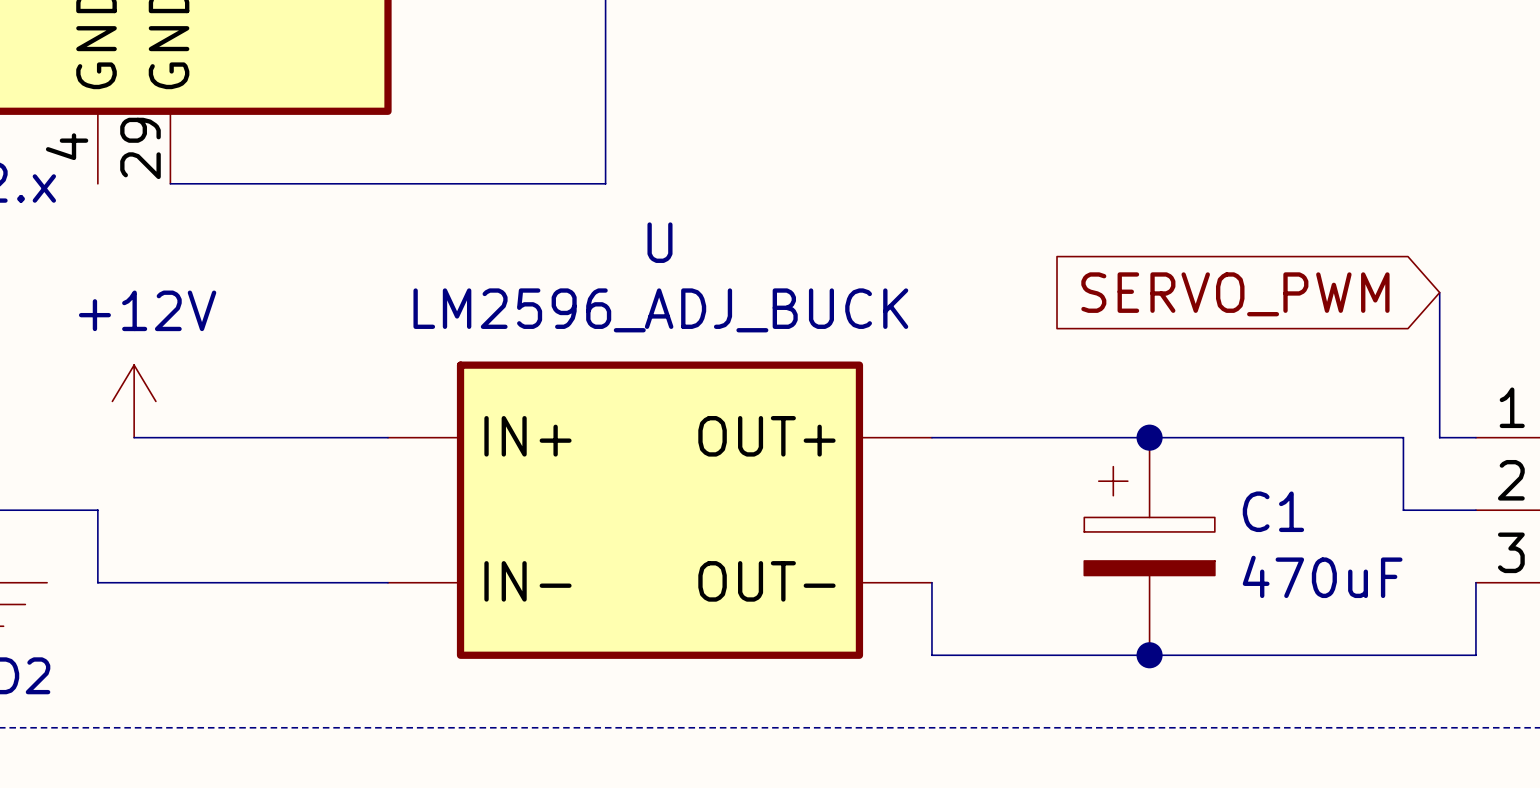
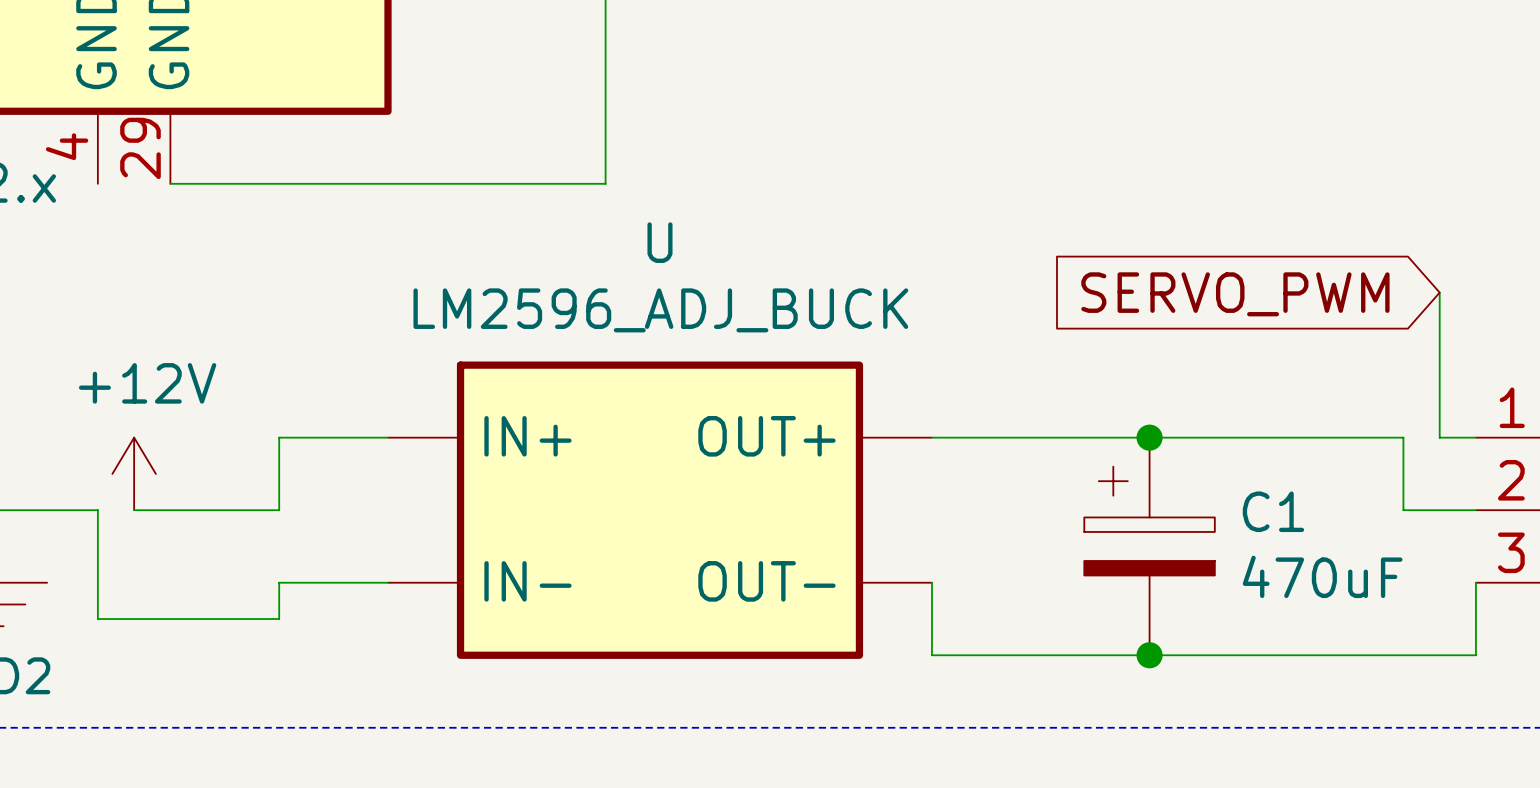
power symbol position: +12V (134, 401) -> +12V (134, 473)
wire: (134, 437) (279, 437) -> (134, 510) (279, 510) (279, 437)
wire: (97, 582) (279, 582) -> (97, 582) (97, 618) (279, 618) (279, 582)

